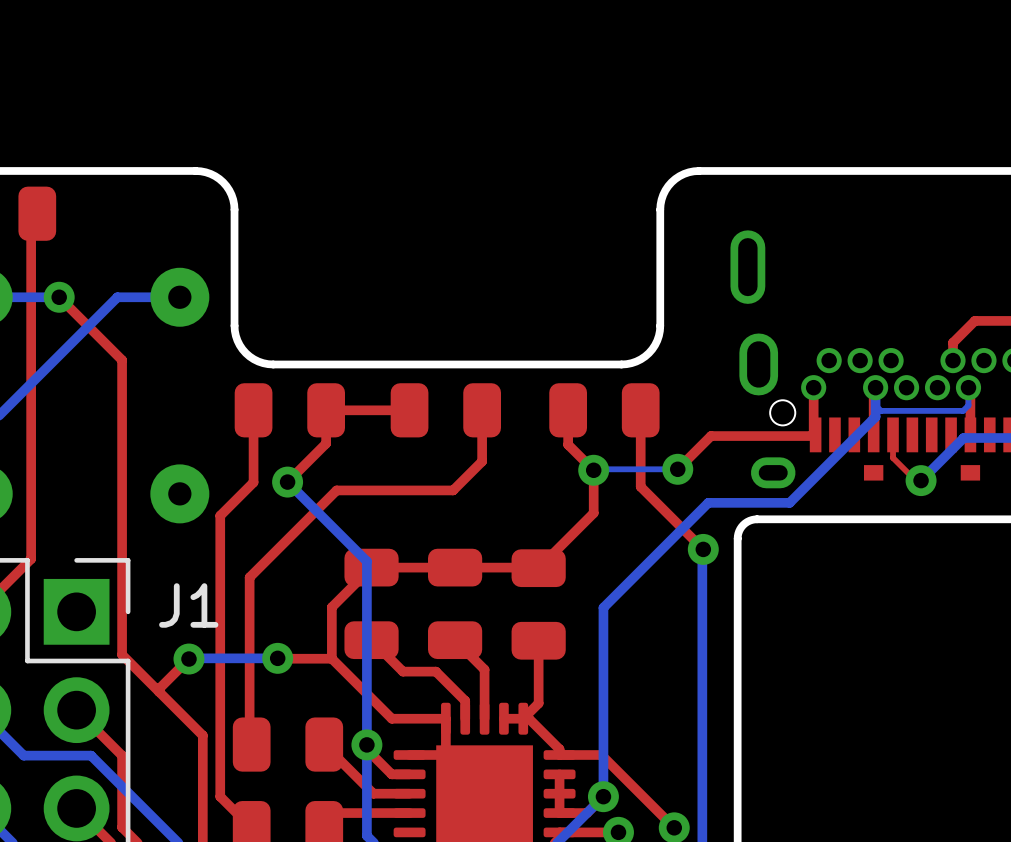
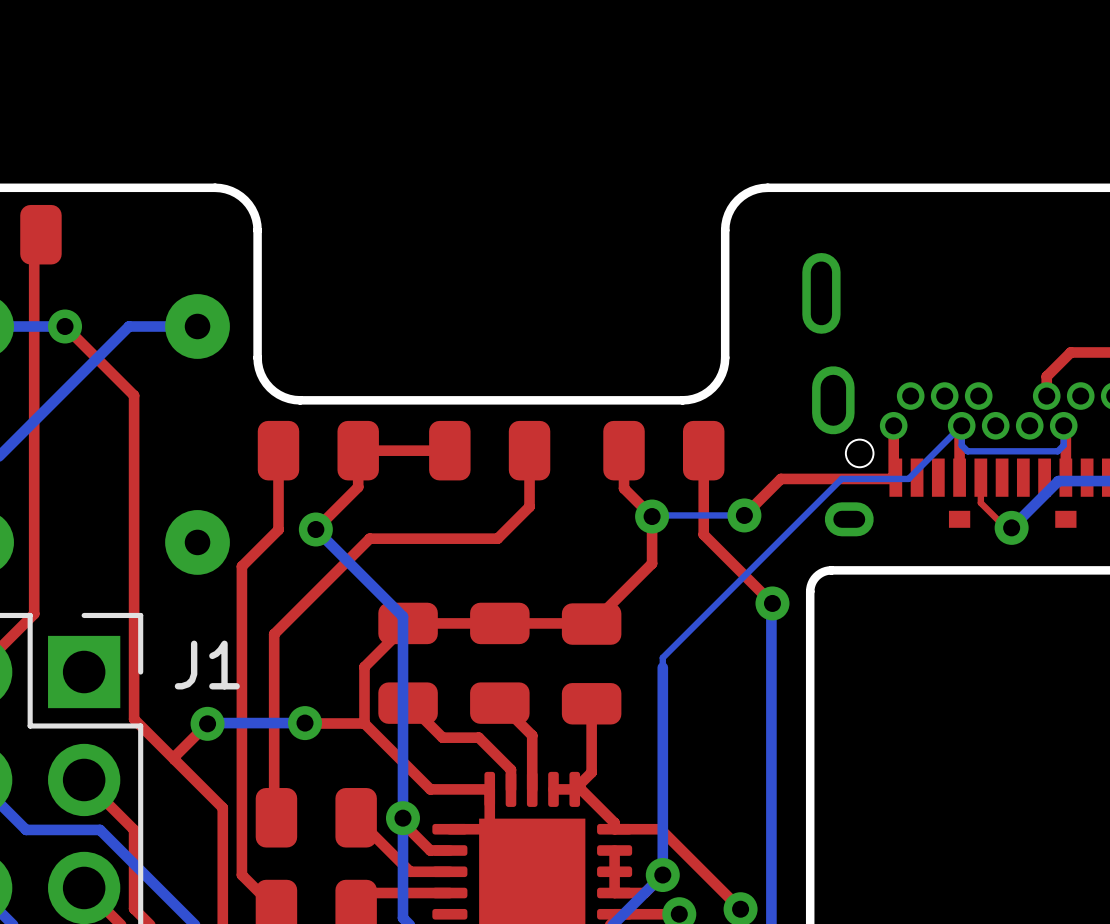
bottom track: (875, 387) (875, 416) (789, 502) (708, 502) (603, 607) -> (961, 425) (908, 478) (841, 478) (662, 657) (662, 667)

